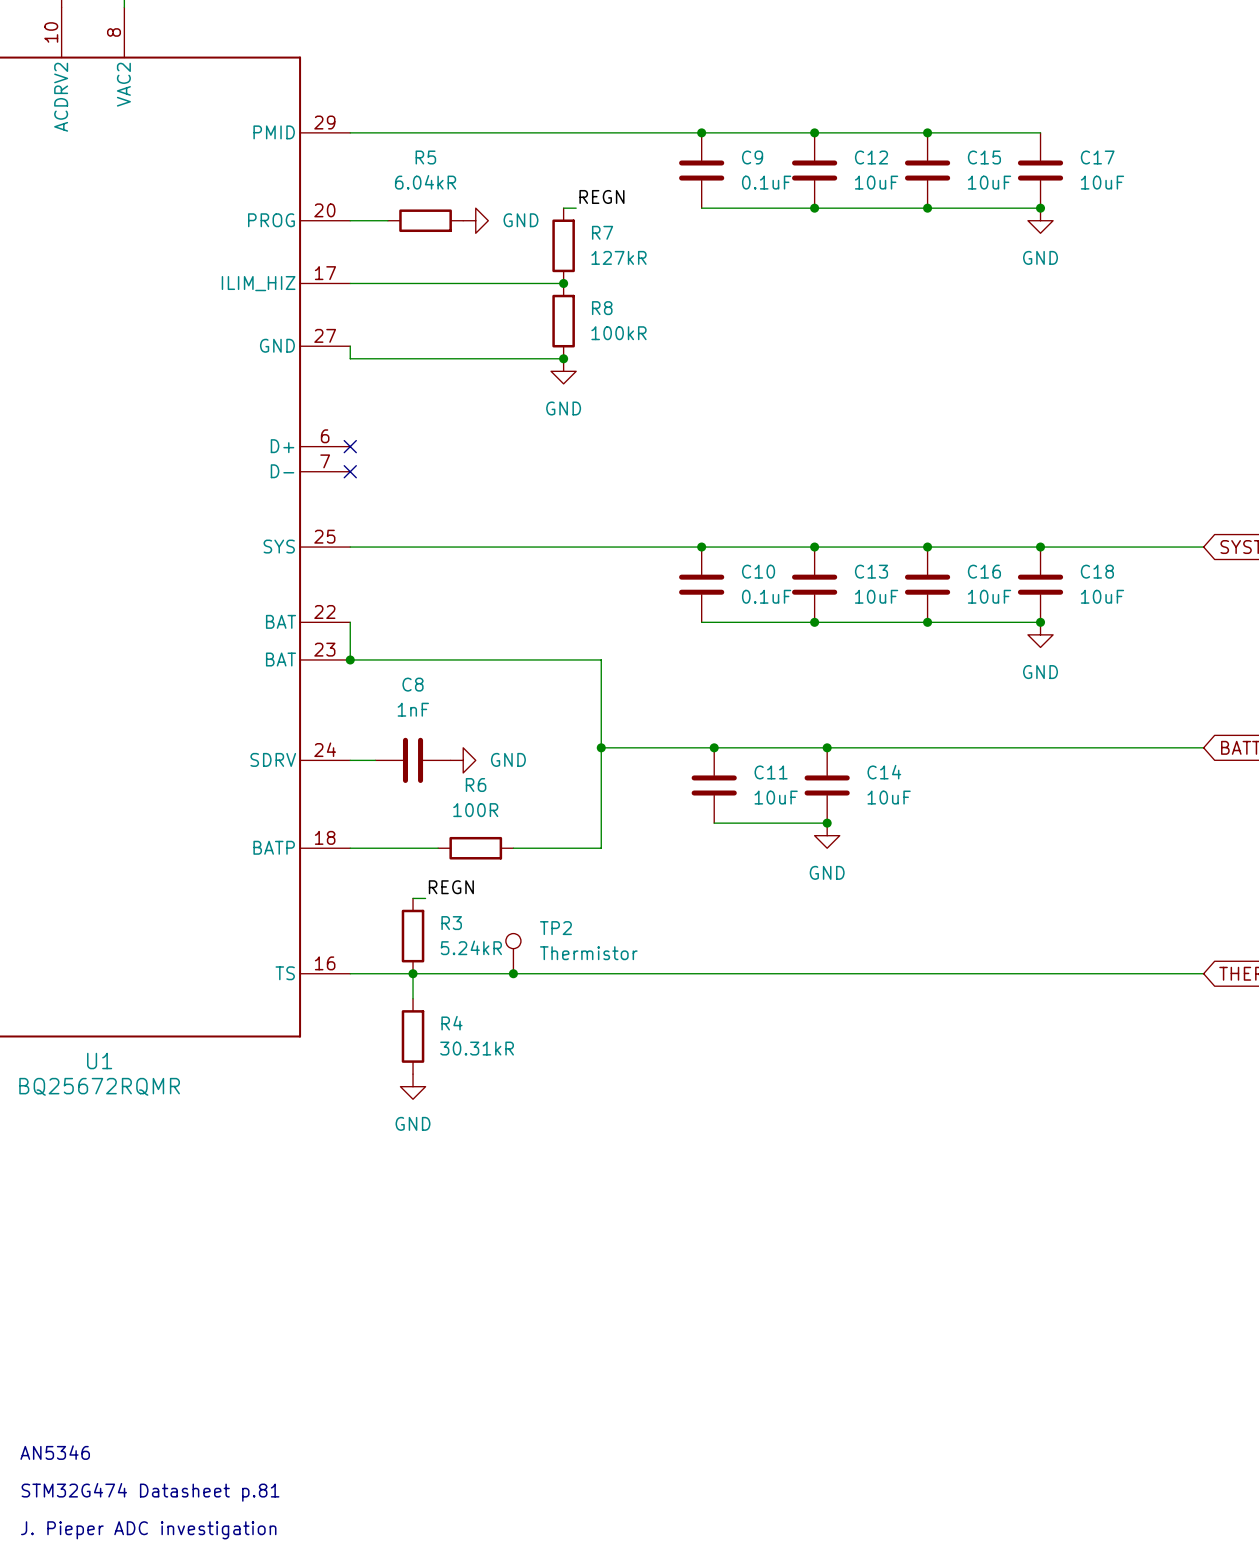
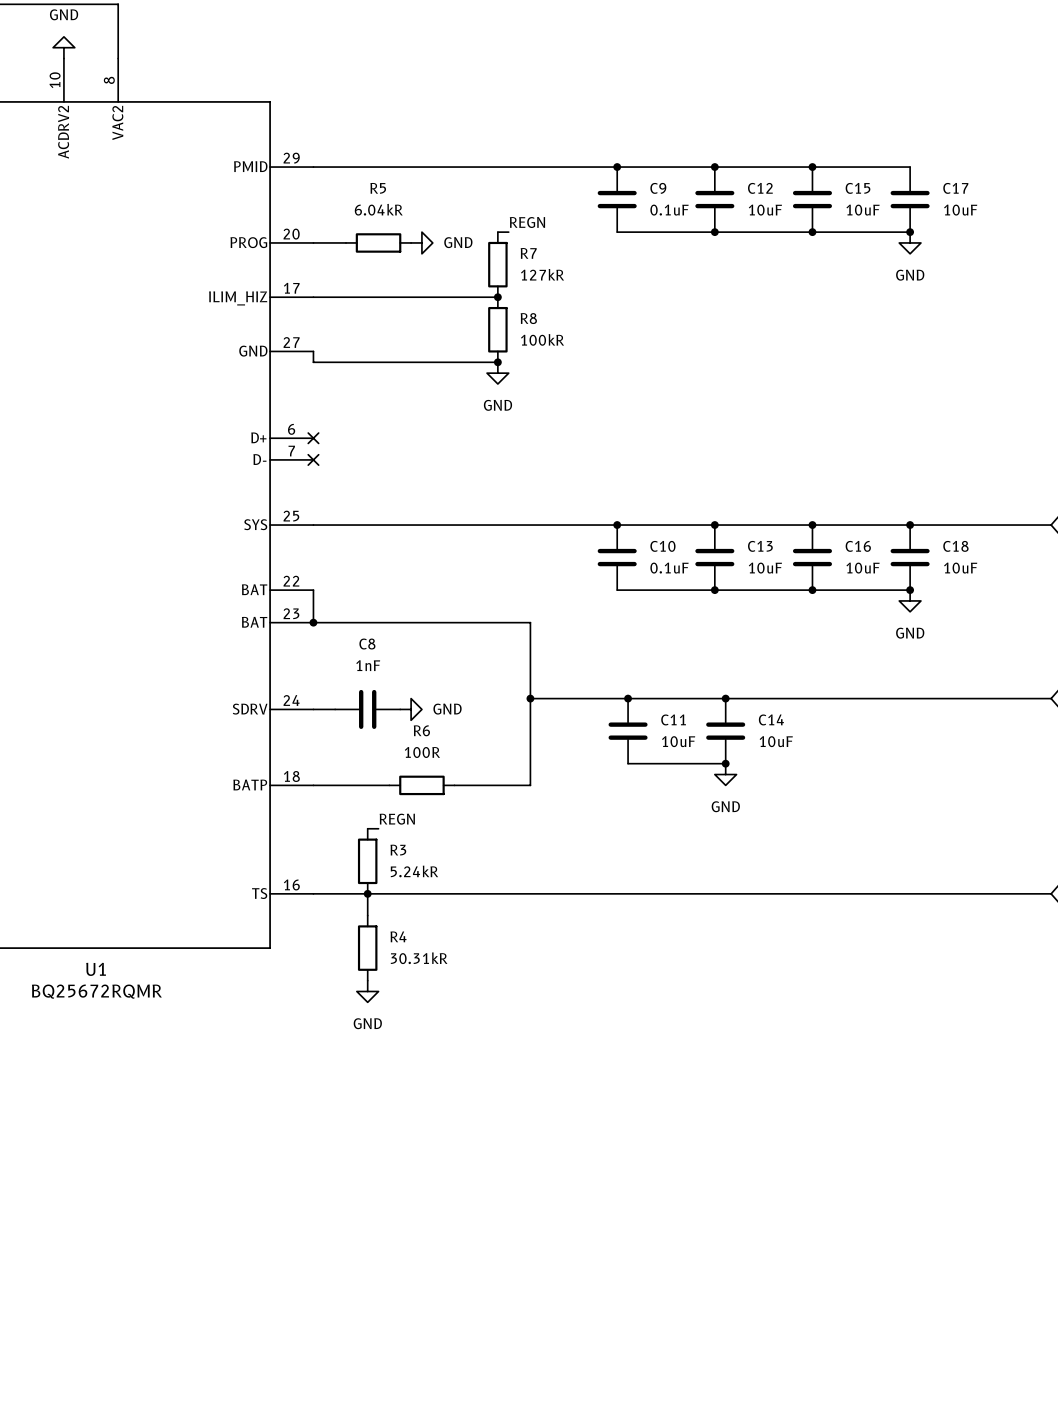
TP2: Thermistor (513, 953) -> none
junction: (513, 973) -> none
text: AN5346 (55, 1452) -> none
text: STM32G474 Datasheet p.81 (150, 1492) -> none
text: J. Pieper ADC investigation (148, 1530) -> none

